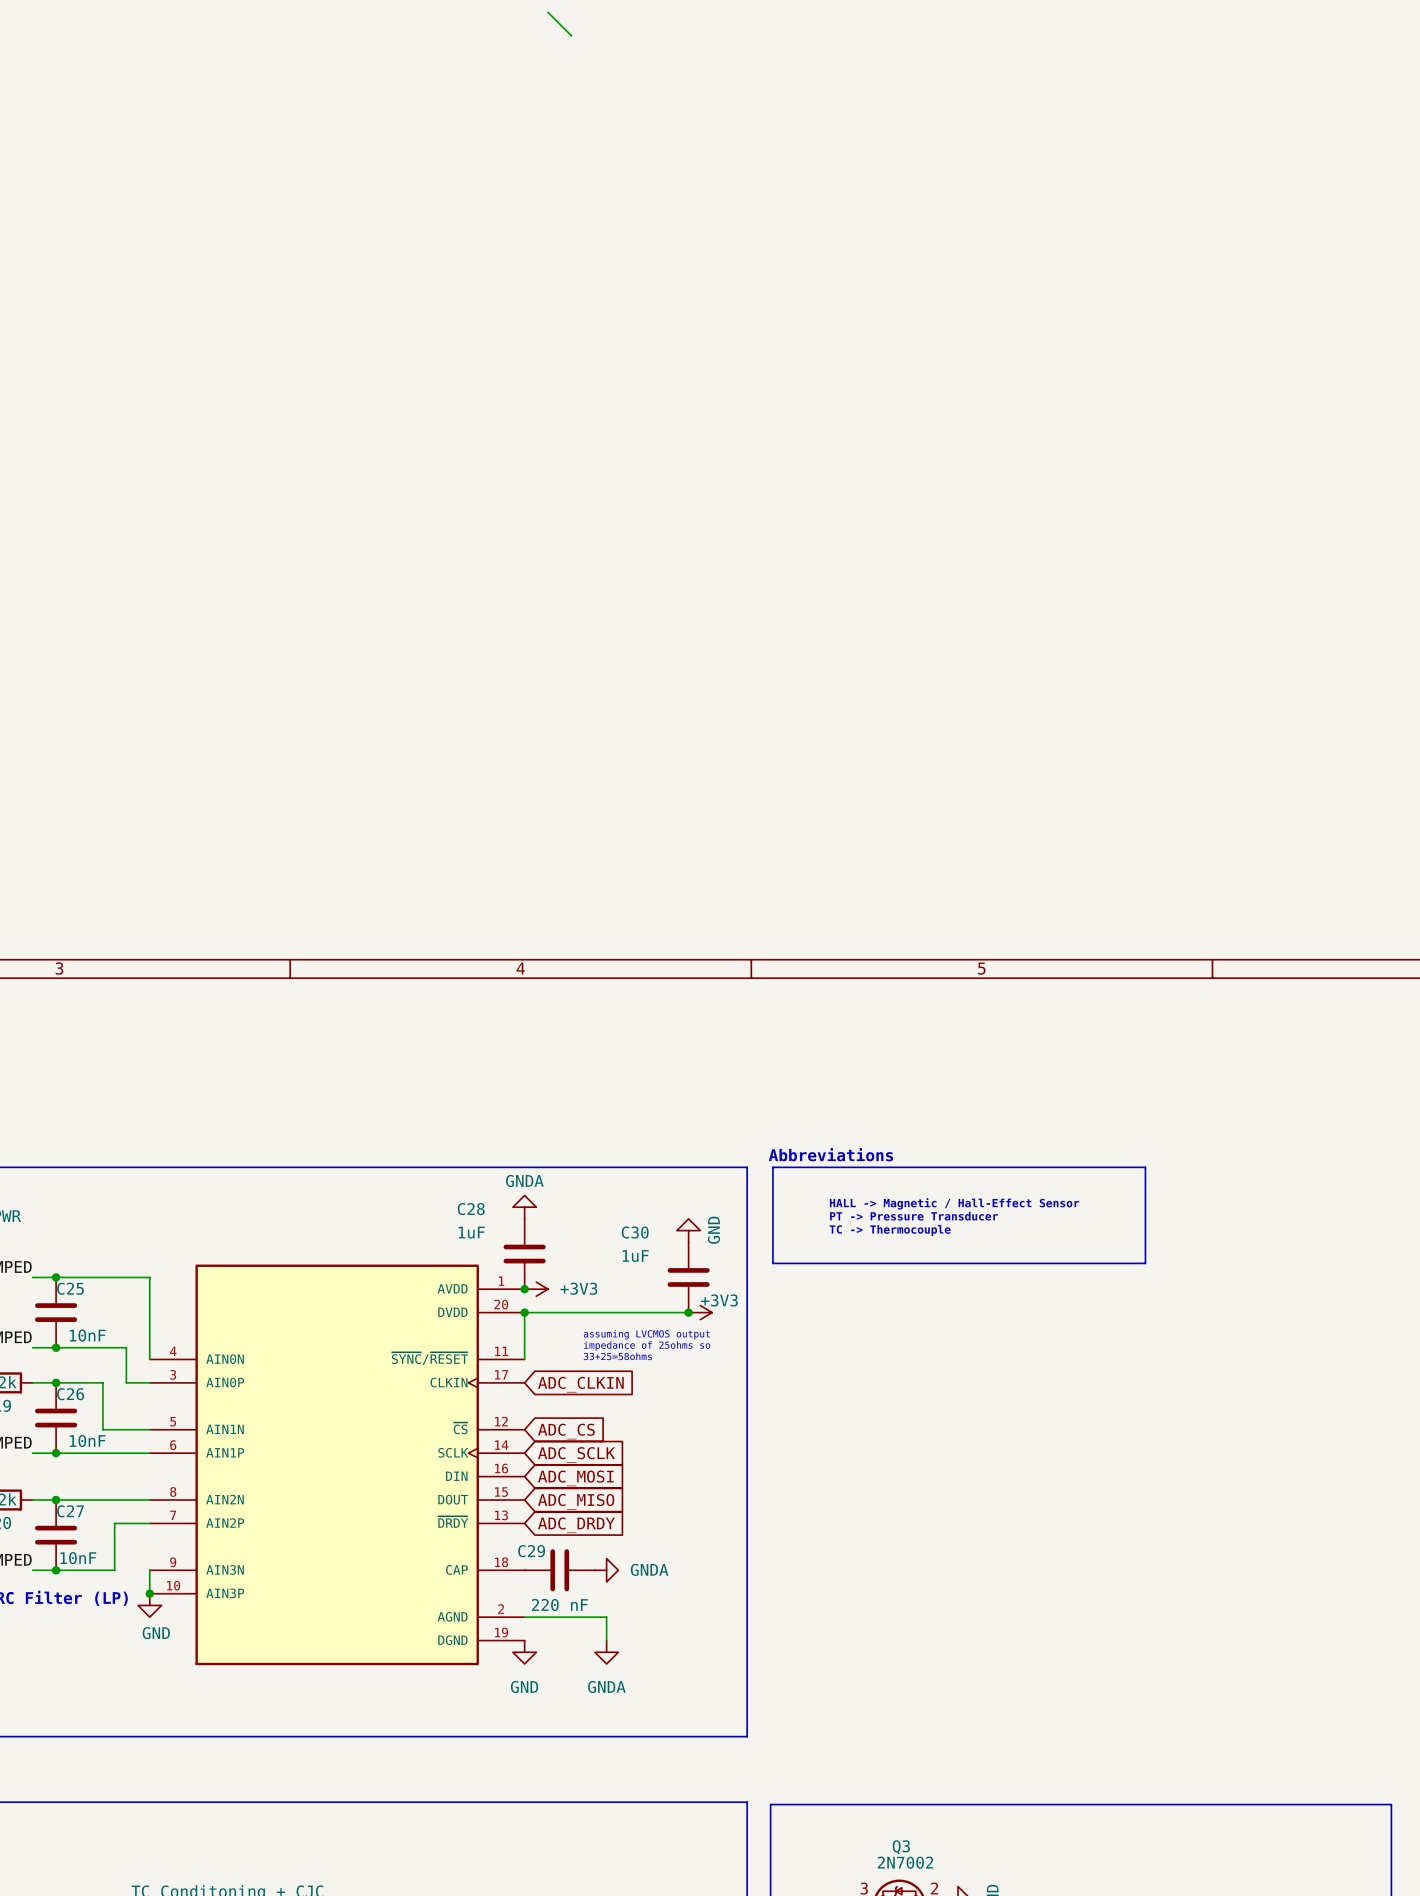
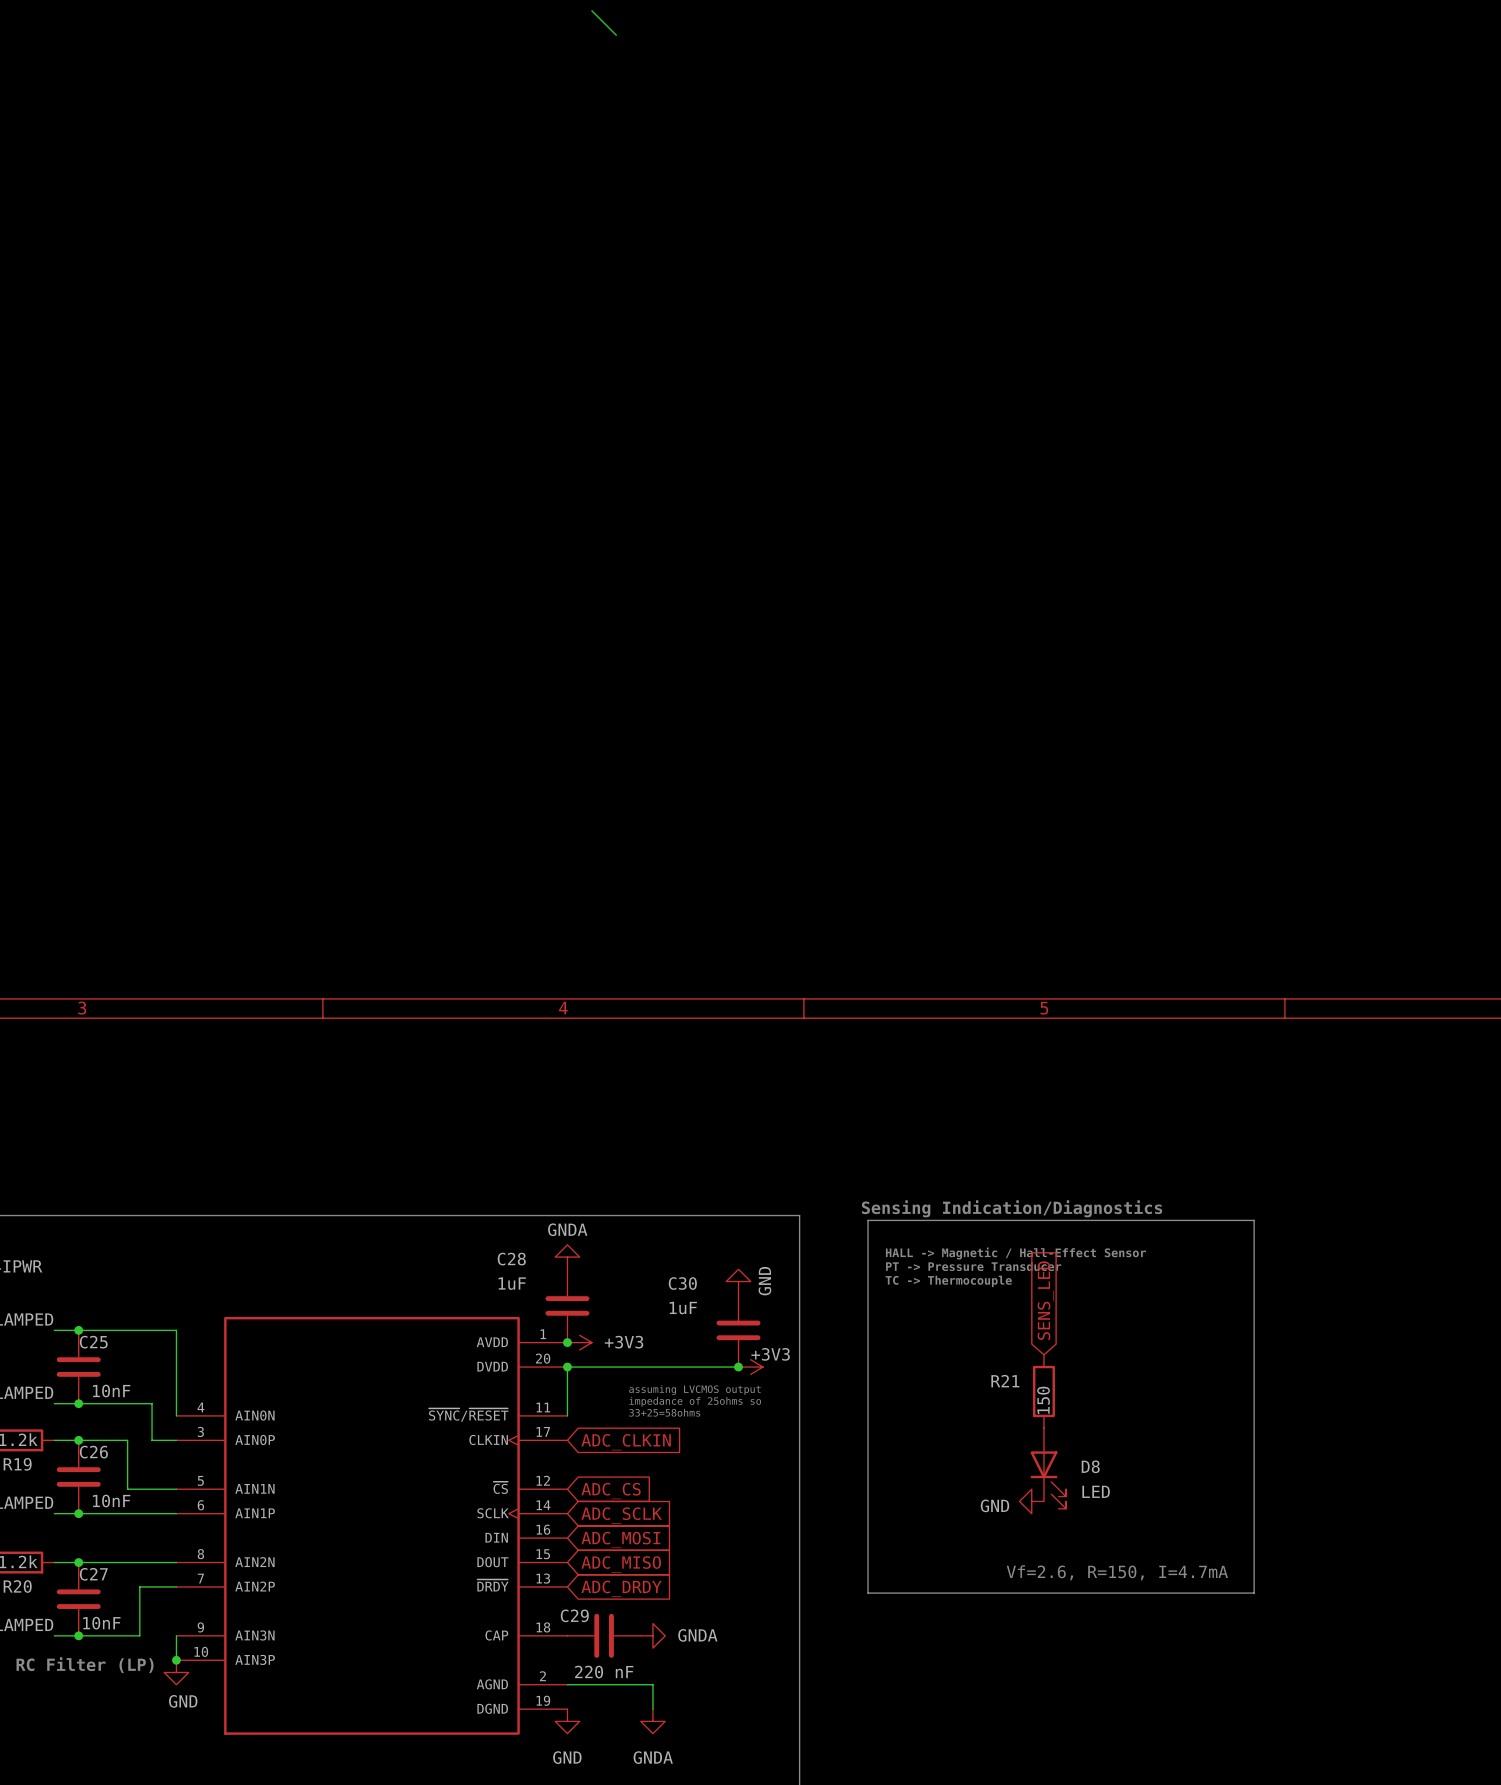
text: Abbreviations (830, 1154) -> none
text: none -> Sensing Indication/Diagnostics (1012, 1208)
line: (772, 1167) (1145, 1167) (1145, 1263) (772, 1263) (772, 1167) -> none
line: none -> (868, 1220) (1254, 1220) (1254, 1593) (868, 1593) (868, 1220)
global label: none -> SENS_LED (1045, 1300)
R21: none -> 150 (1043, 1391)
D8: none -> LED (1048, 1468)
power symbol: none -> GND (1031, 1501)
text: none -> Vf=2.6, R=150, I=4.7mA (1117, 1572)

